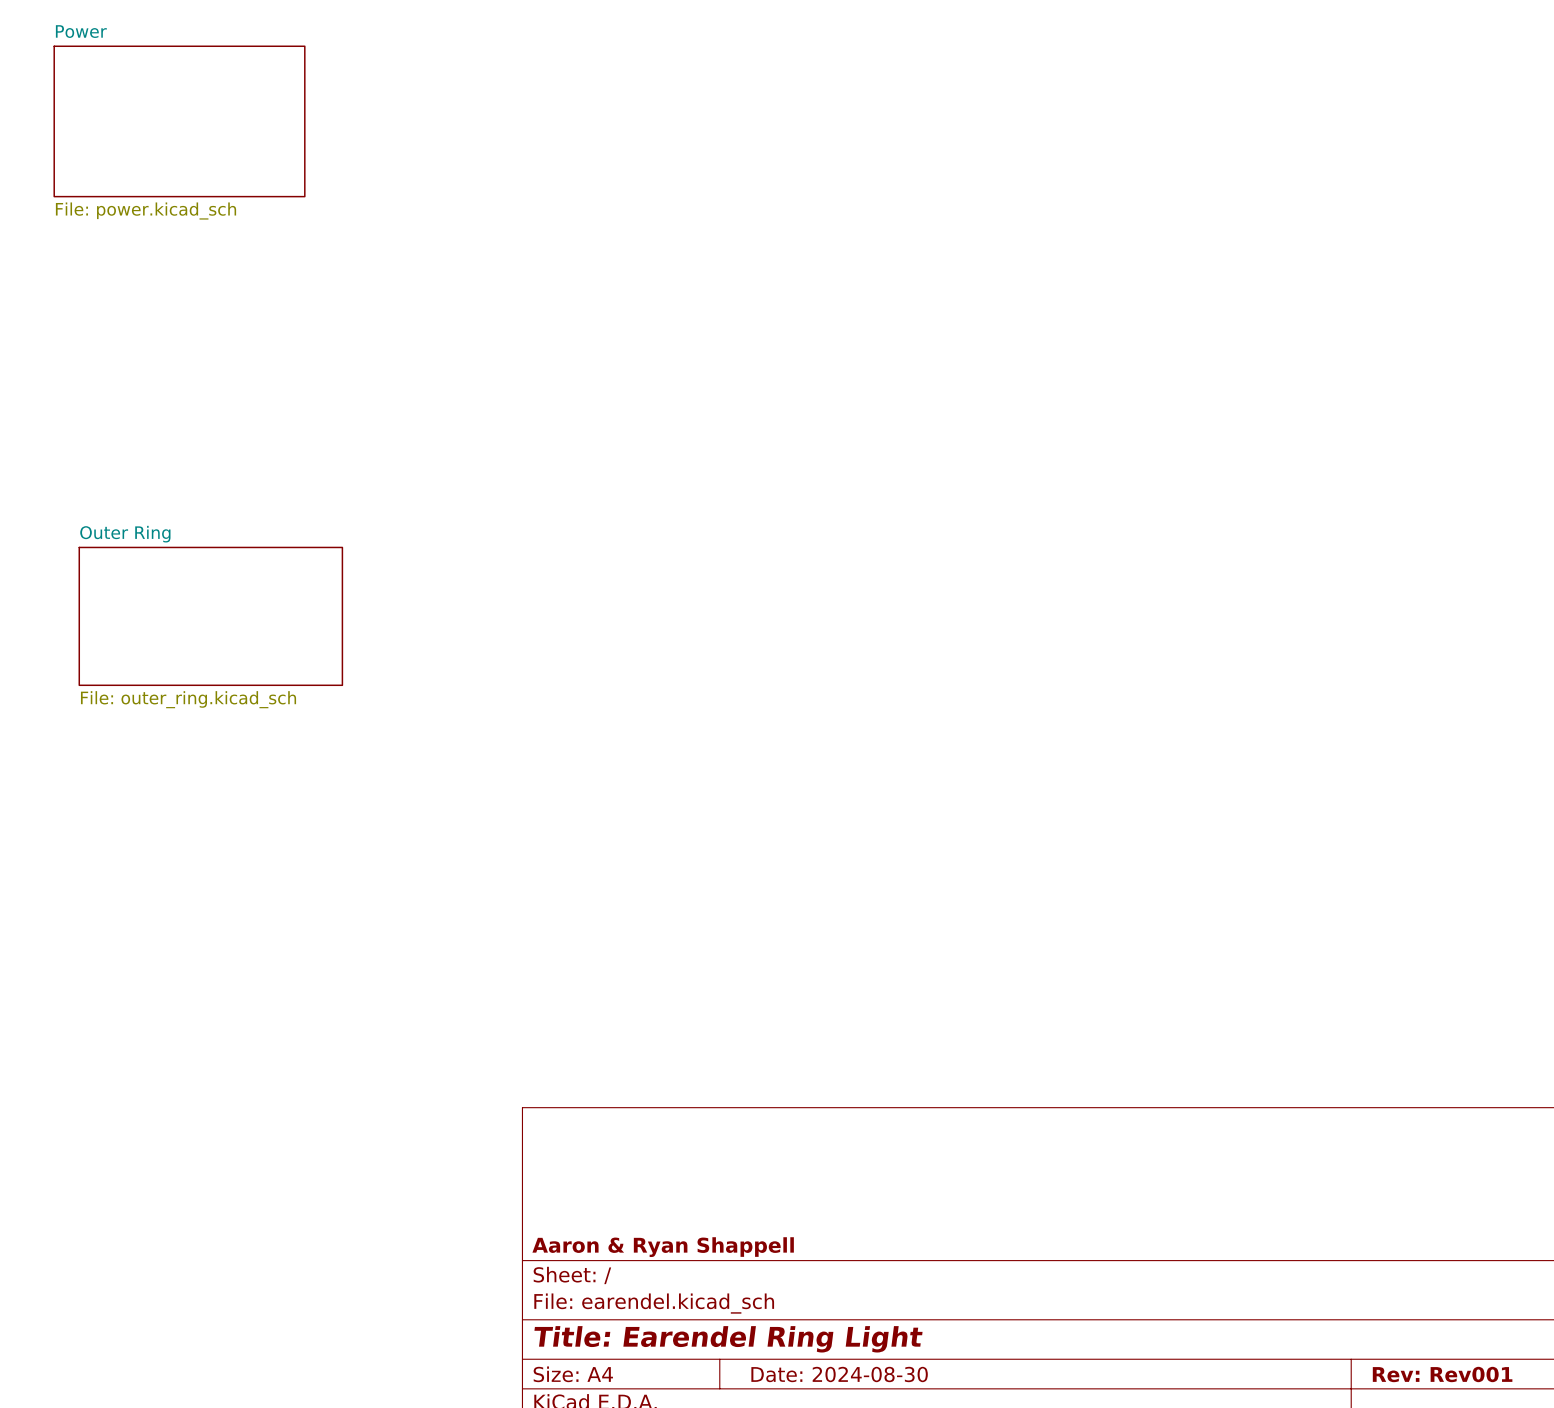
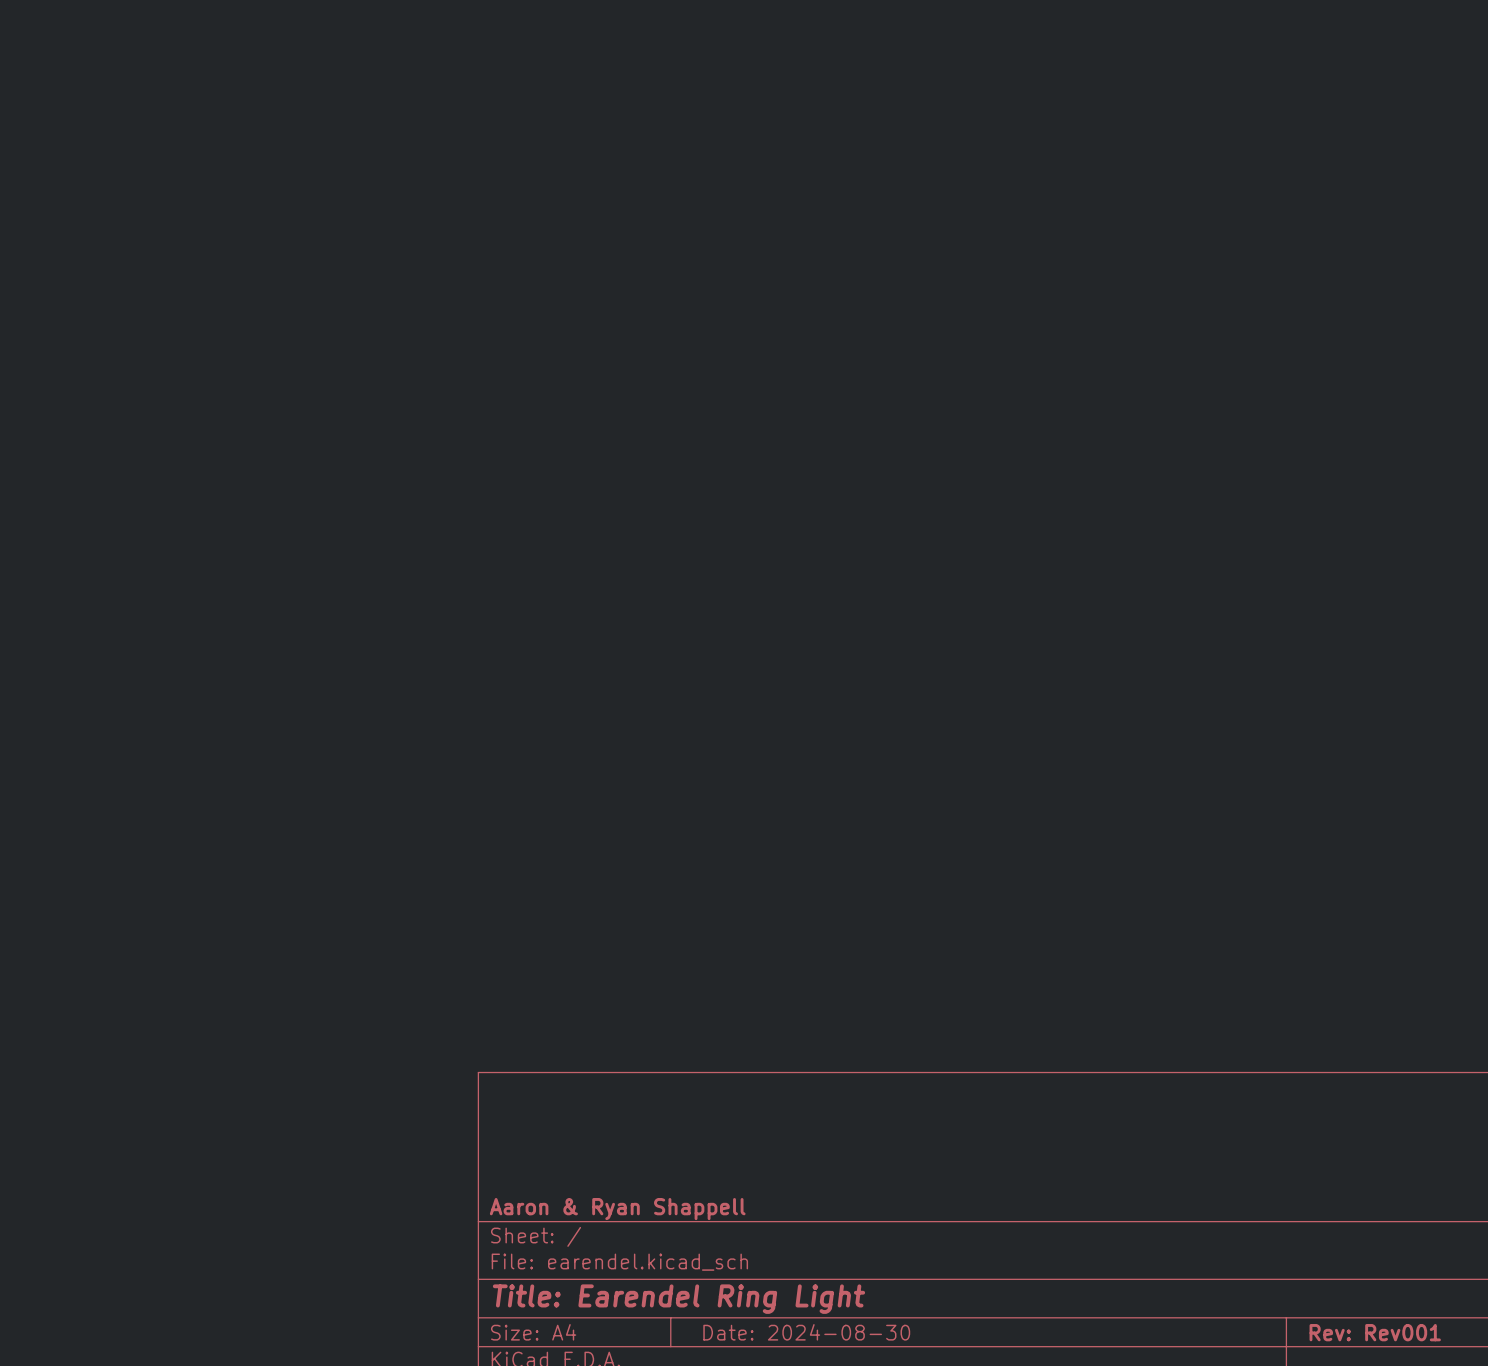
sheet Power: File: power.kicad_sch (179, 121) -> none
sheet Outer Ring: File: outer_ring.kicad_sch (210, 616) -> none

